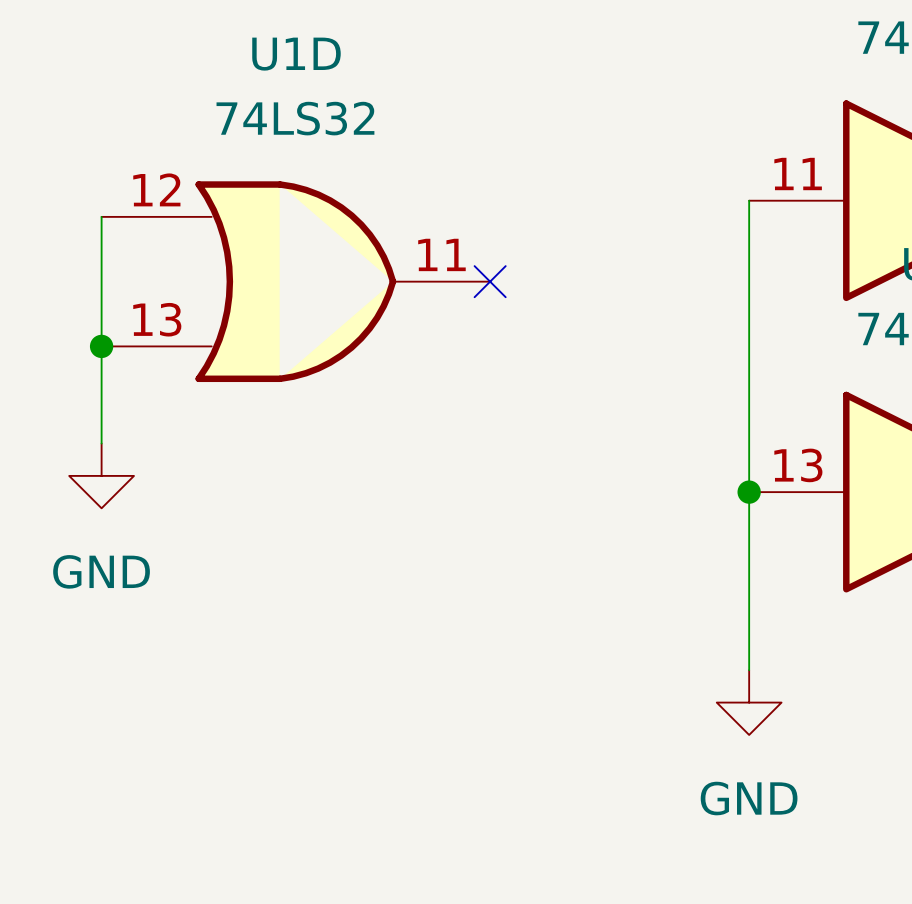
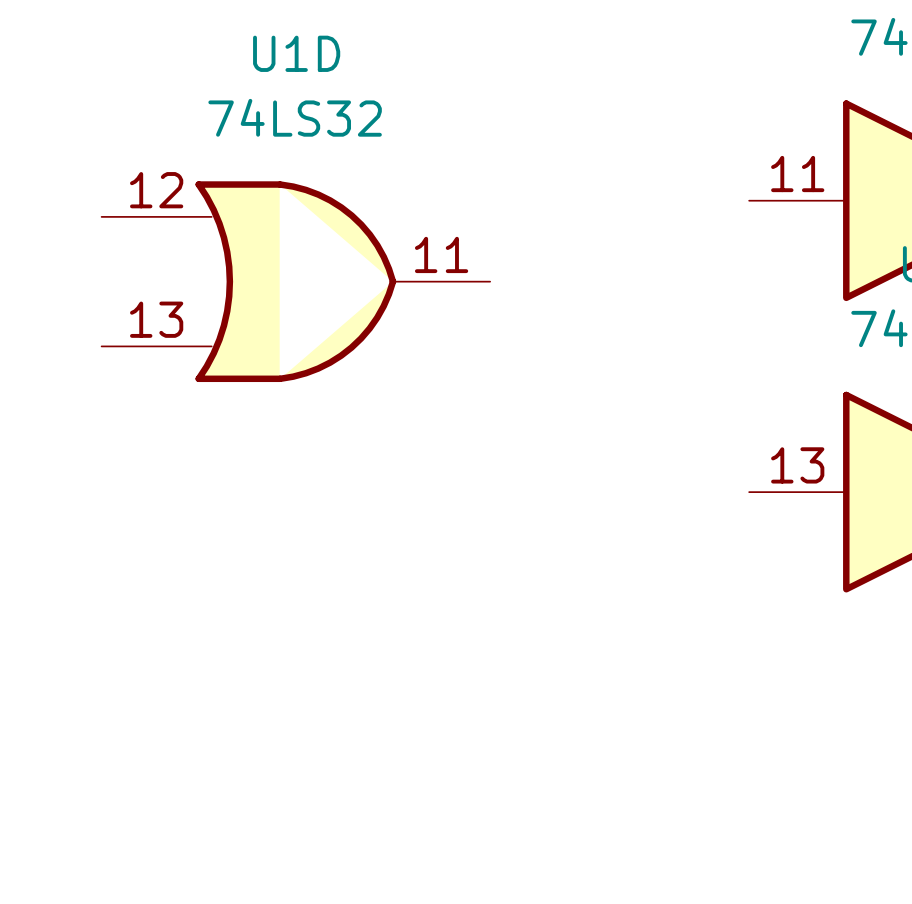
wire: (749, 200) (749, 670) -> none
wire: (101, 216) (101, 443) -> none
no-connect mark: (490, 281) -> none
junction: (101, 346) -> none
power symbol: GND (101, 475) -> none
junction: (749, 492) -> none
power symbol: GND (749, 702) -> none

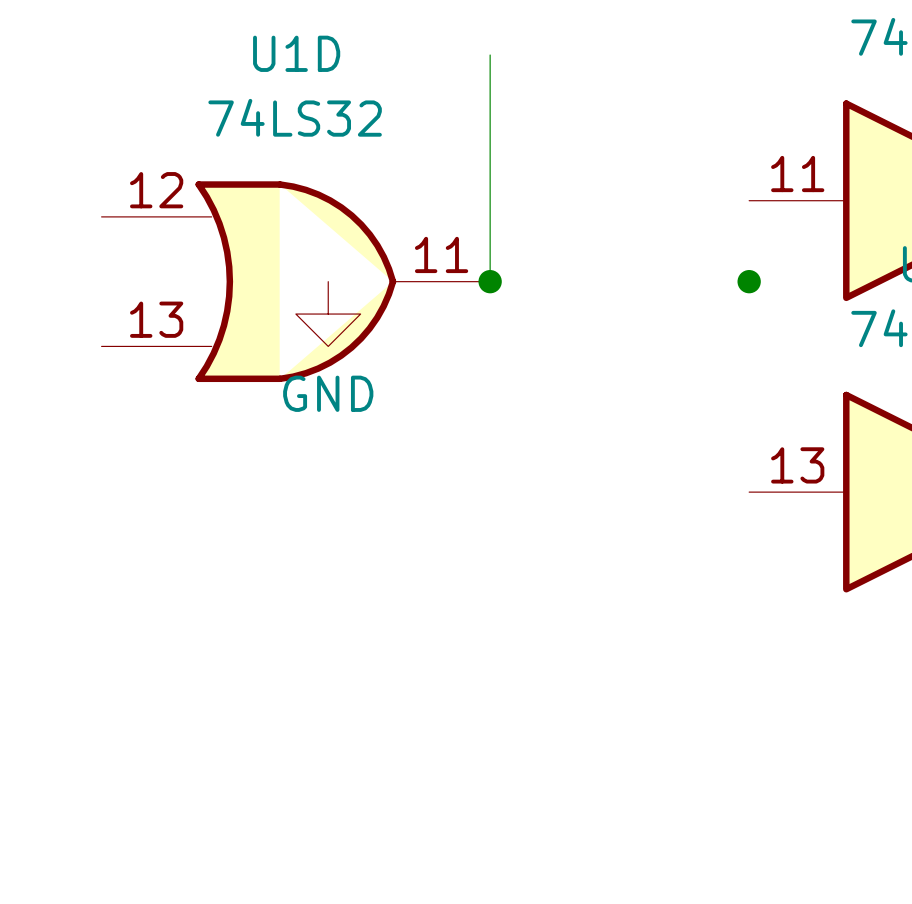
wire: none -> (490, 55) (490, 281)
junction: none -> (490, 281)
junction: none -> (749, 281)
power symbol: none -> GND (328, 314)

